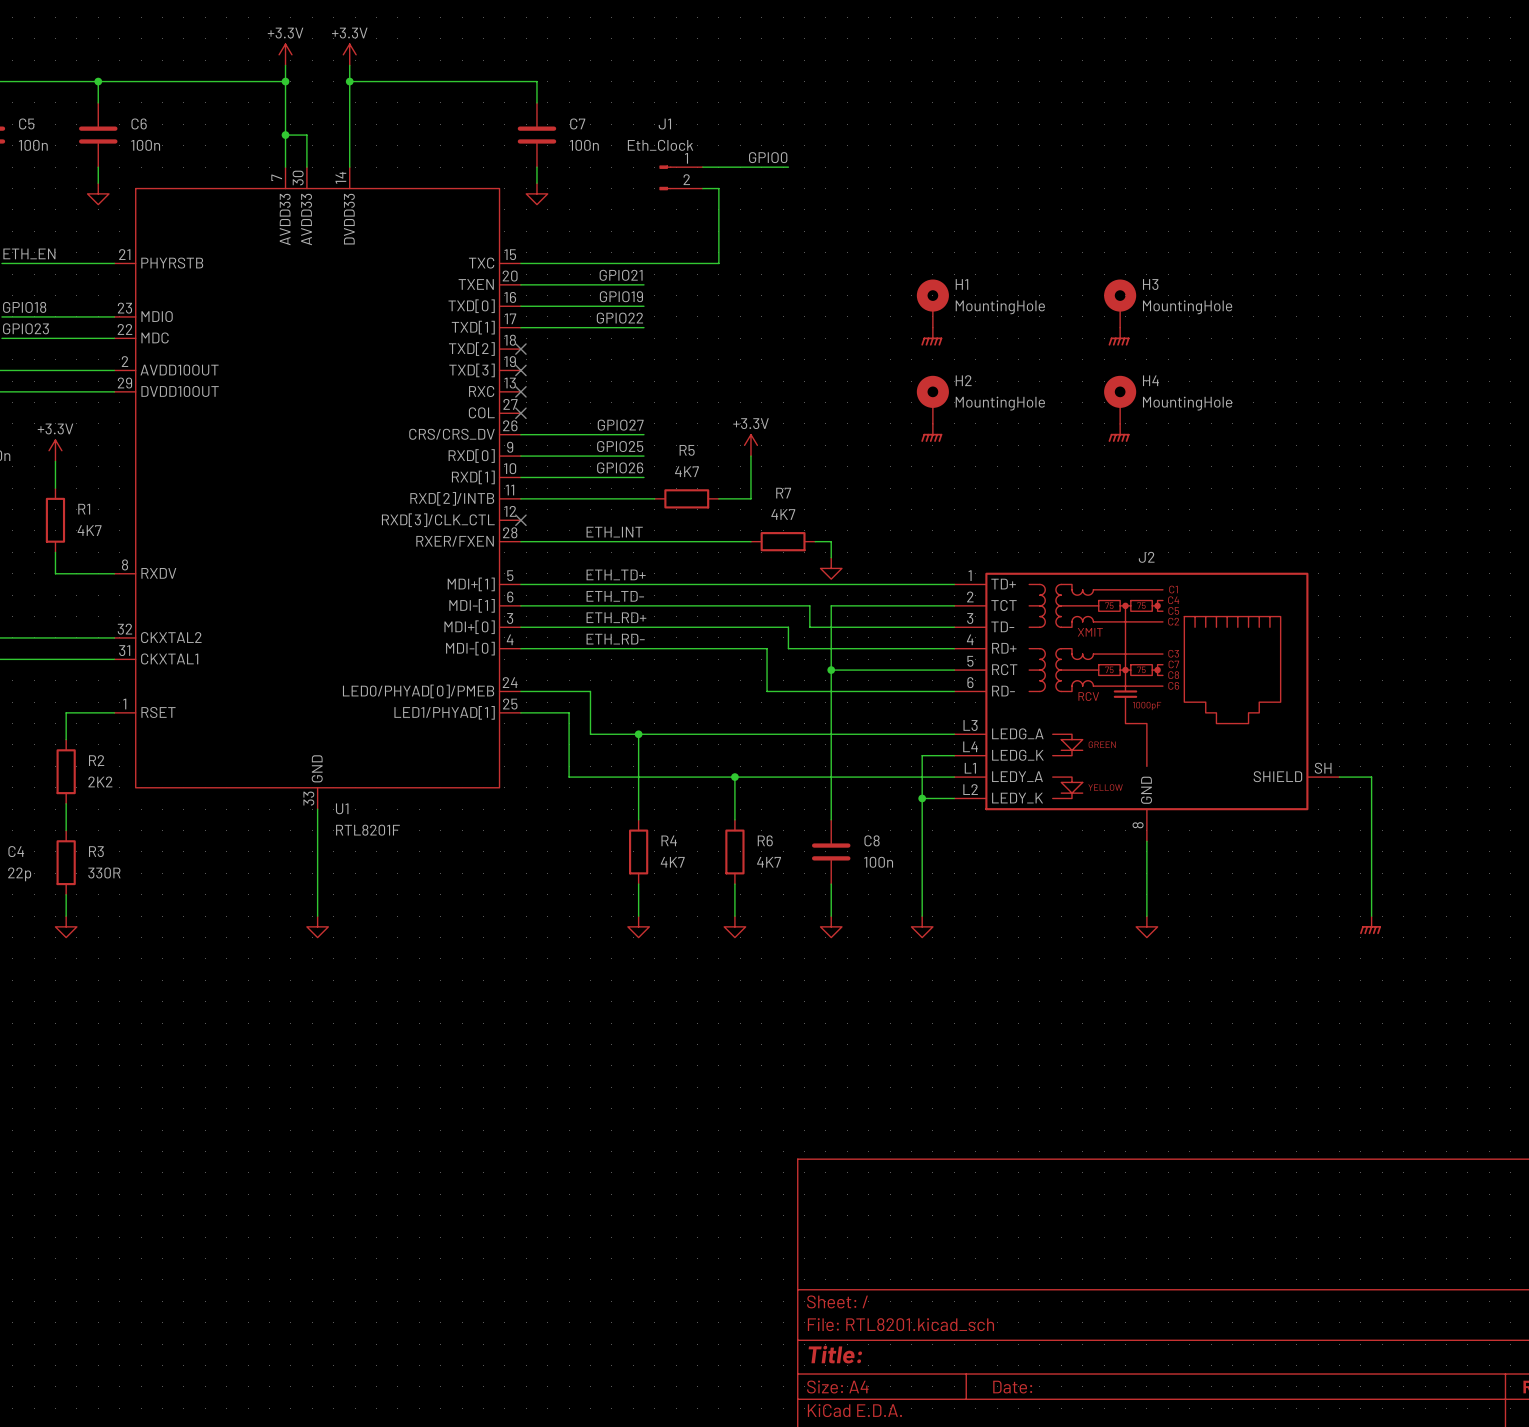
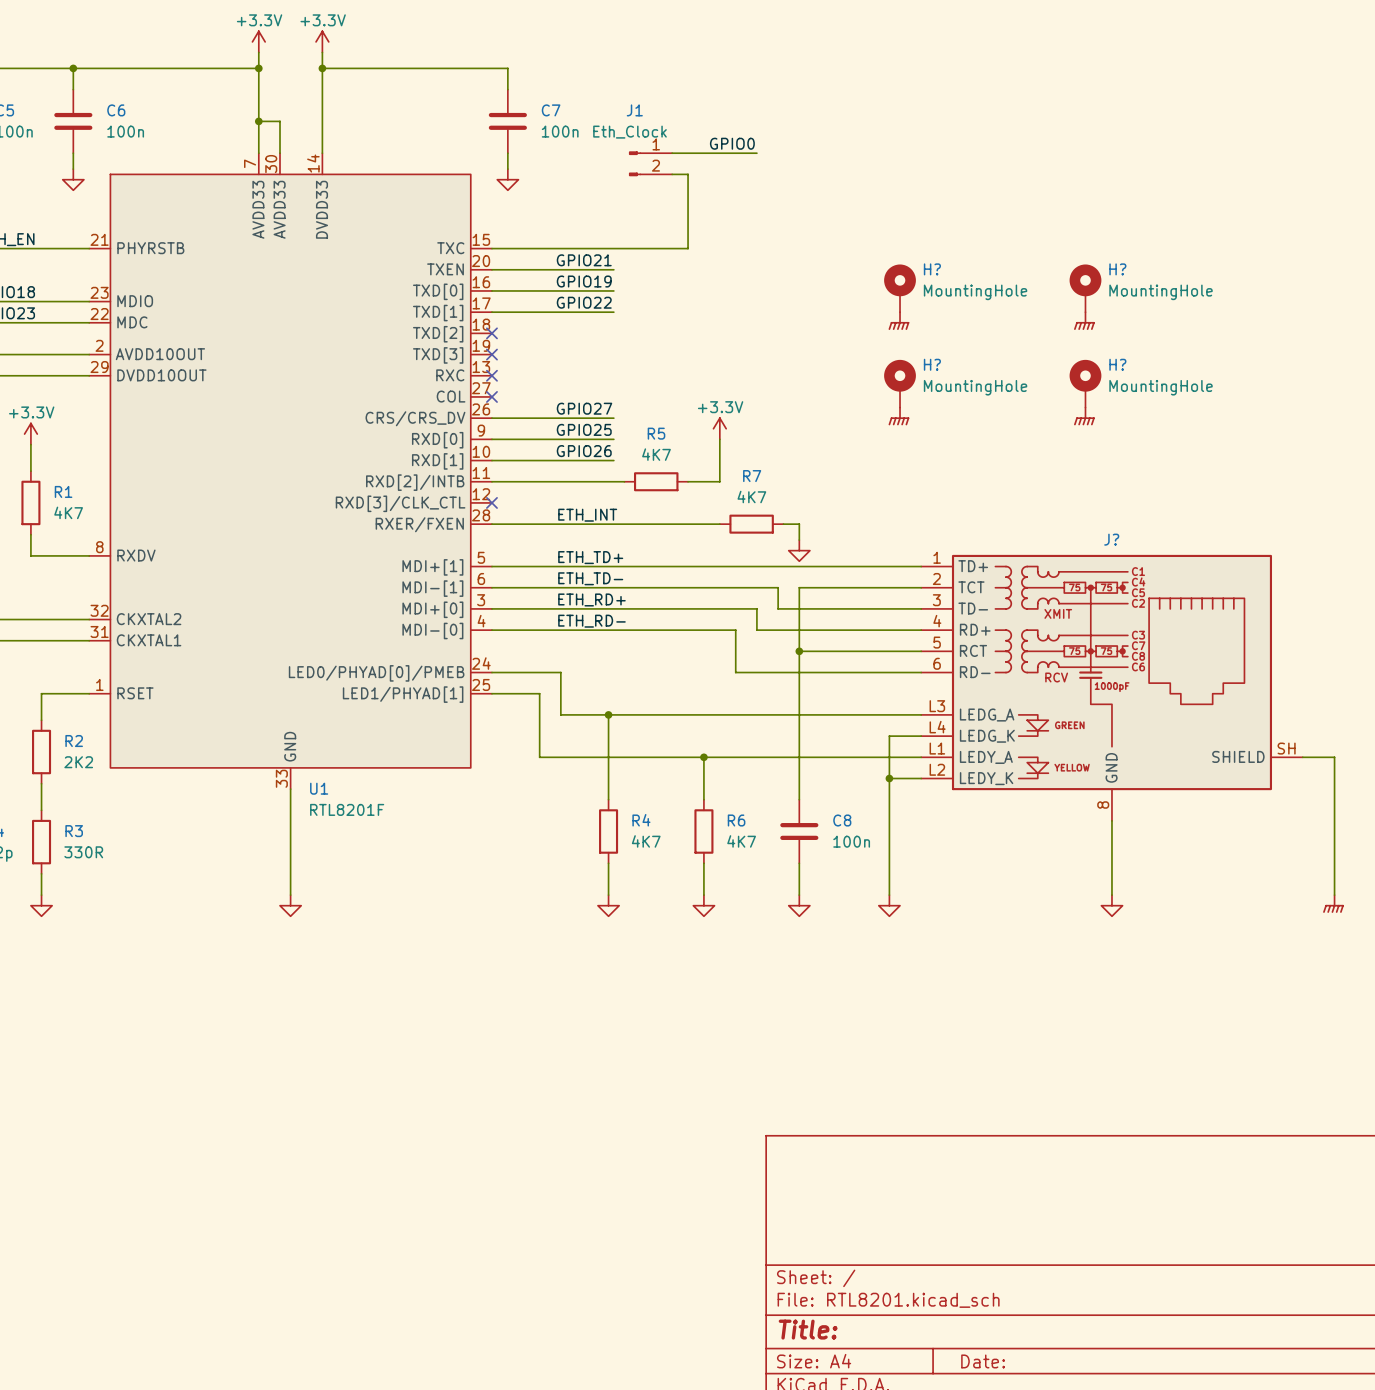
H1 name: H1 (961, 284) -> H? (932, 269)
H3 name: H3 (1150, 284) -> H? (1117, 269)
H2 name: H2 (963, 380) -> H? (932, 364)
H4 name: H4 (1151, 380) -> H? (1117, 364)
J2 name: J2 (1146, 557) -> J? (1111, 539)

